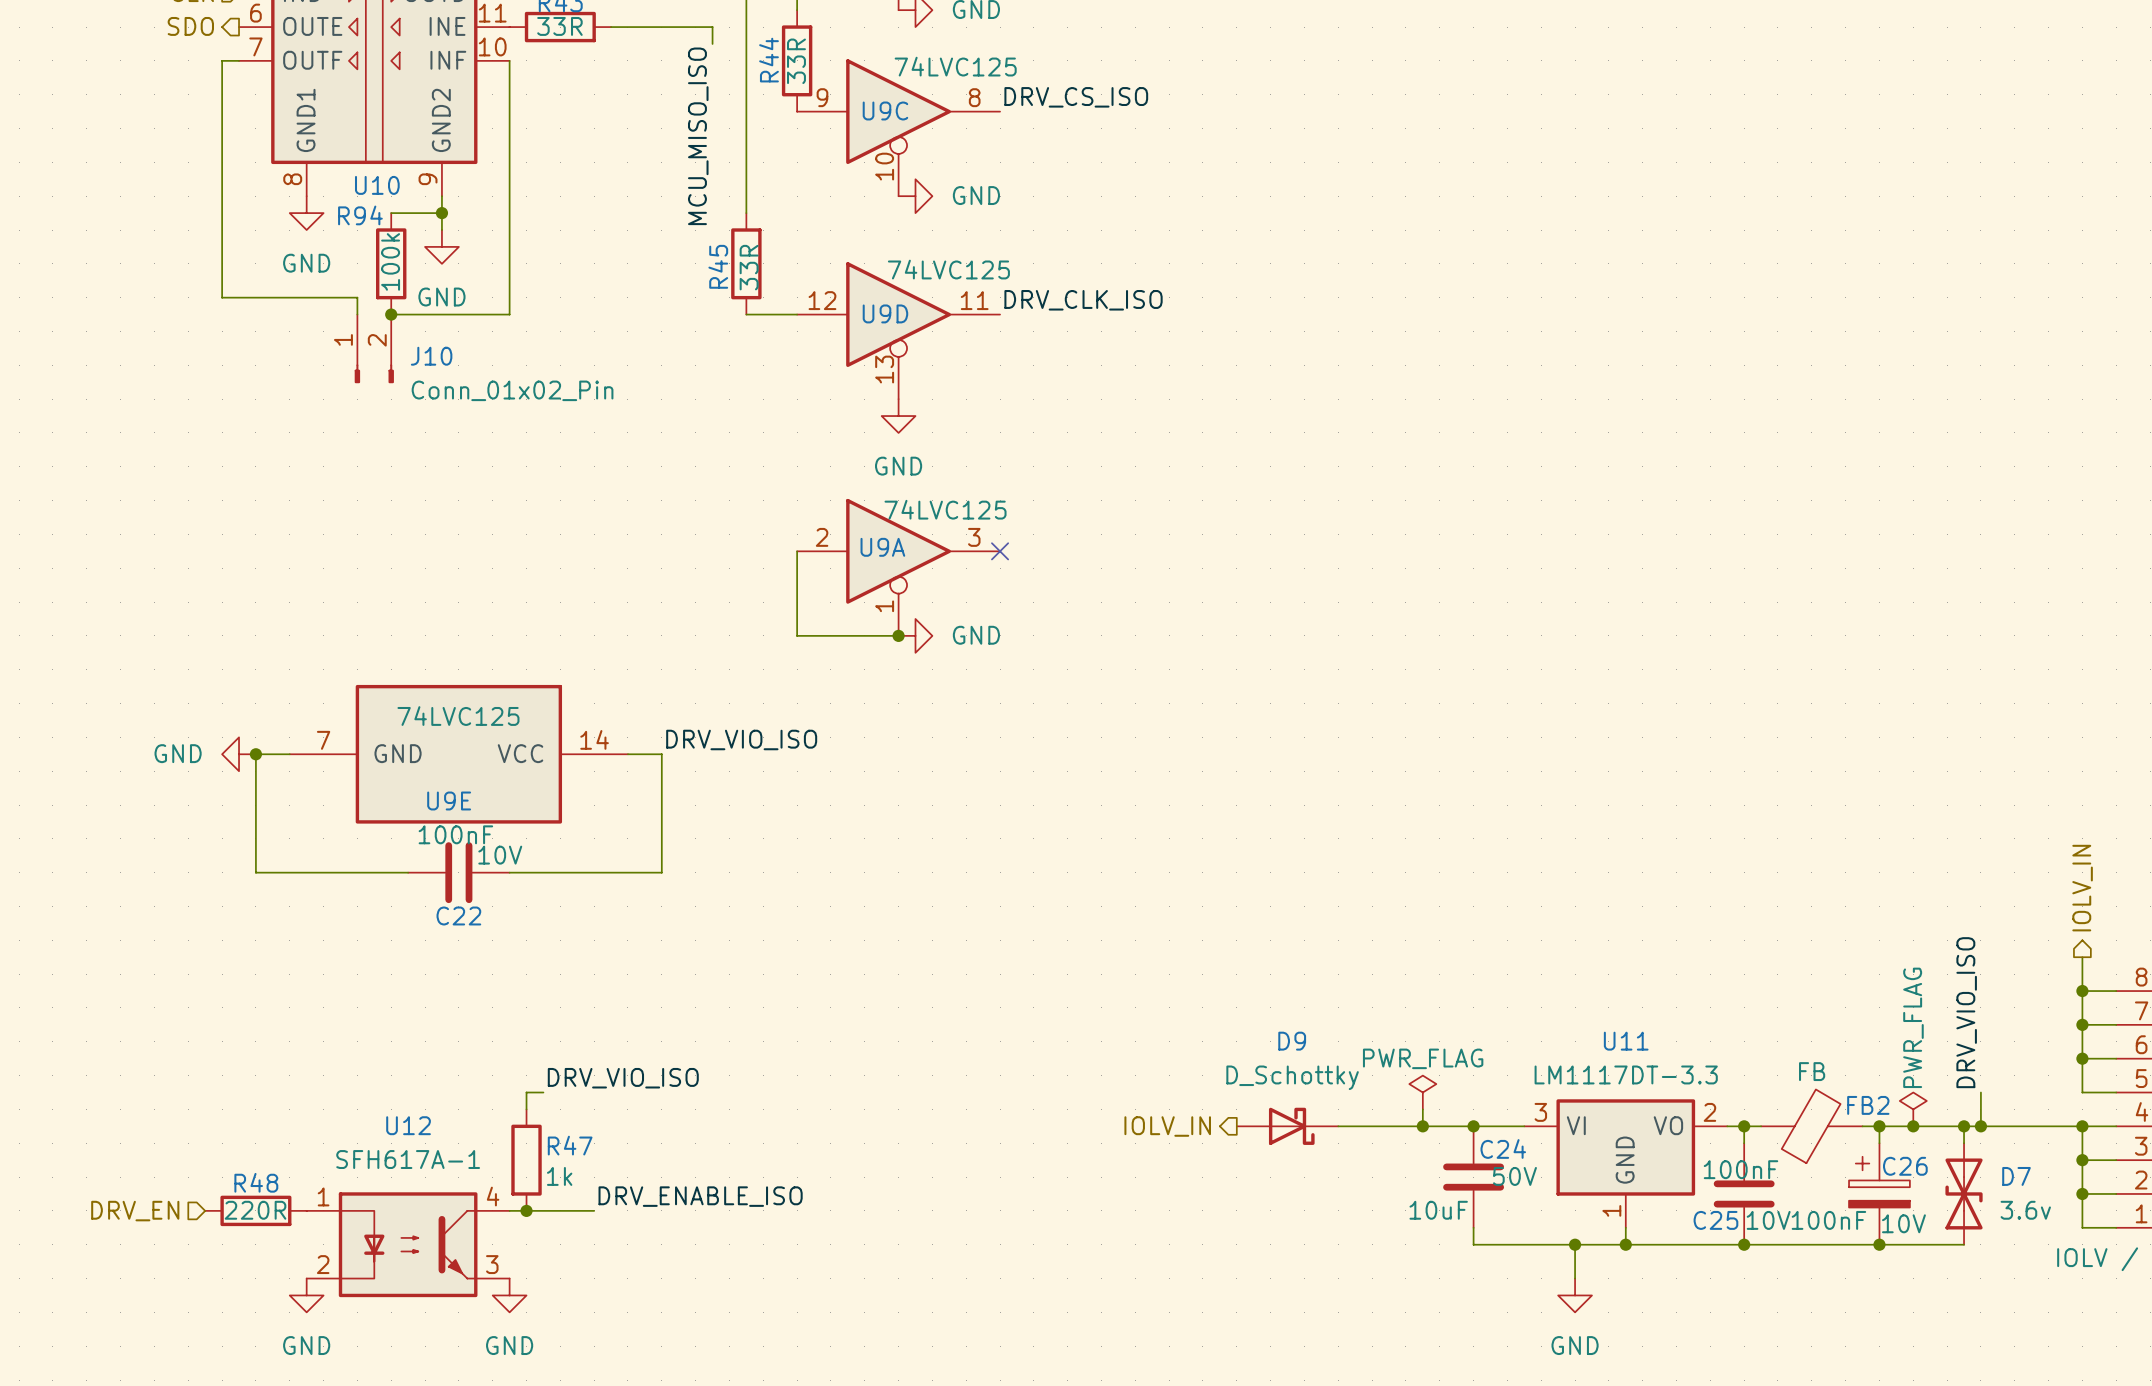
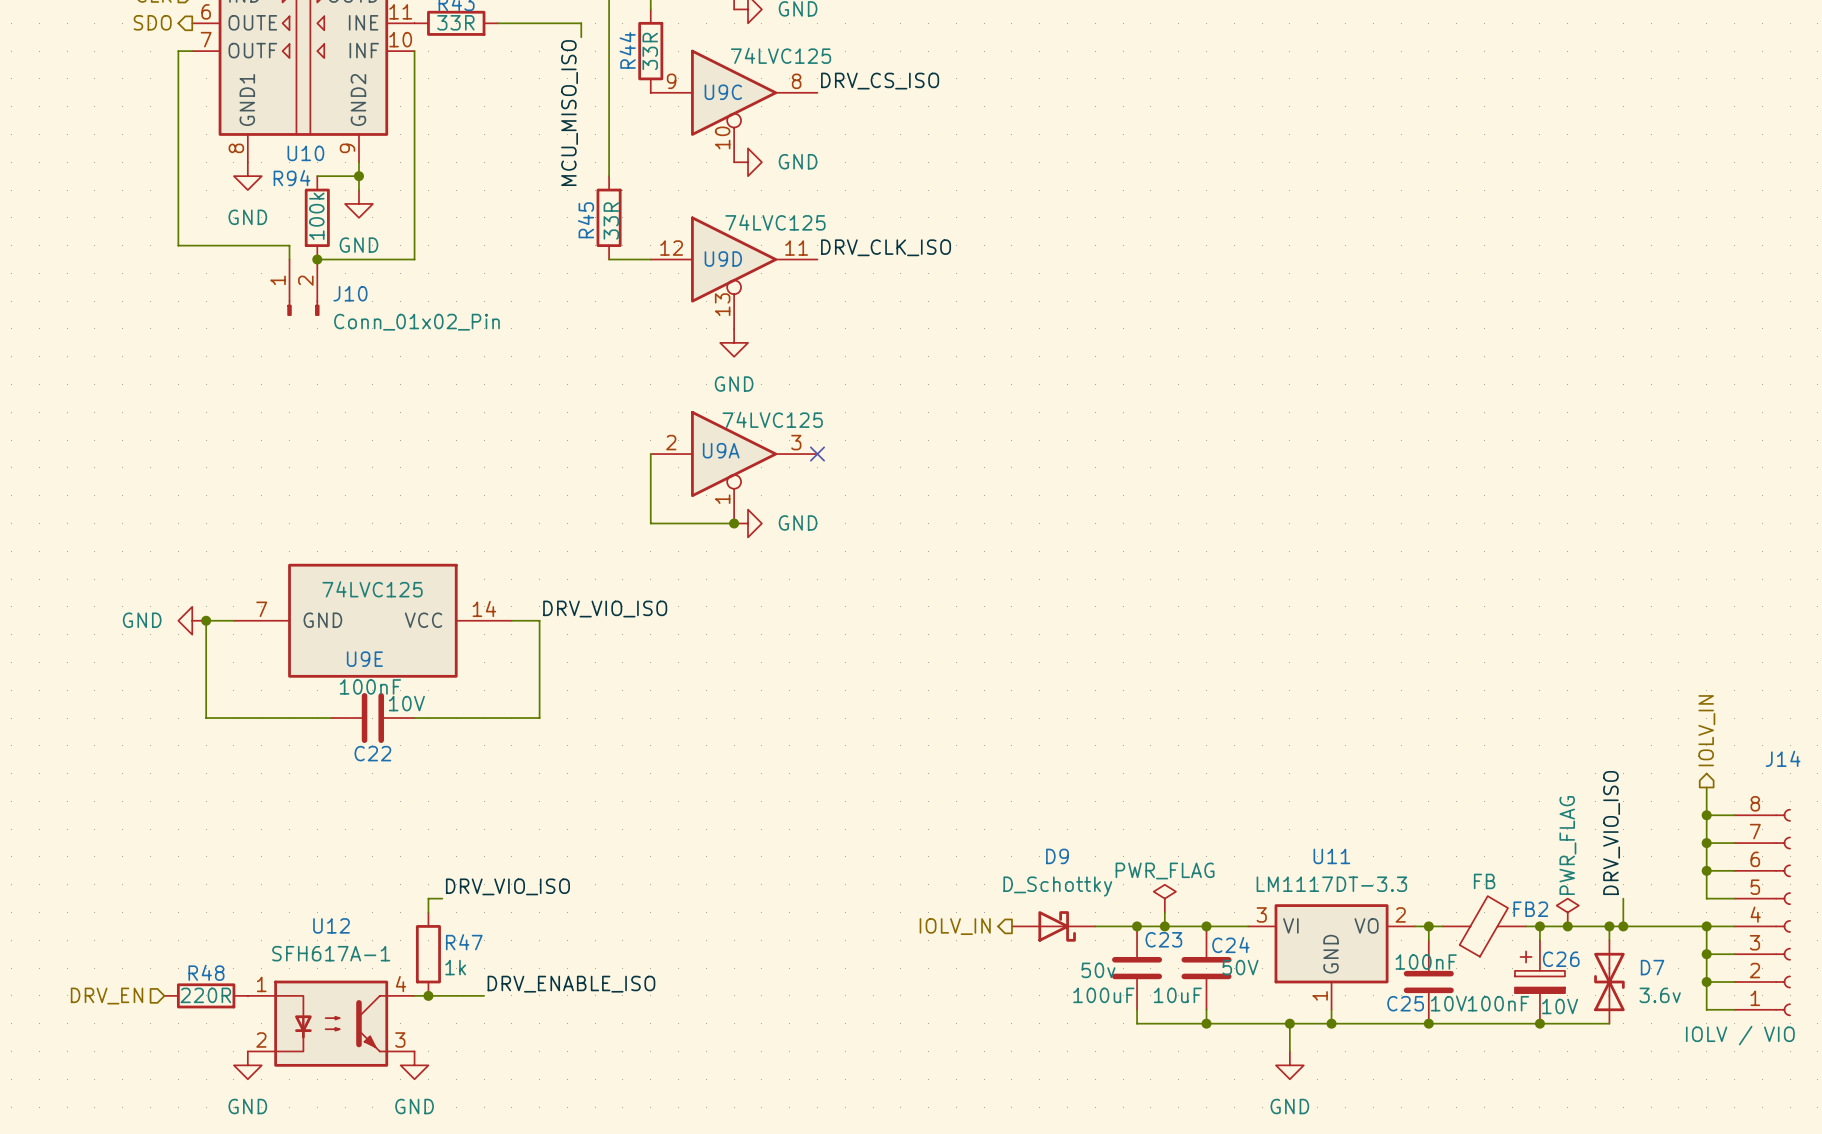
junction: none -> (1137, 926)
C23: none -> 100uF (1137, 968)
wire: none -> (1137, 1009) (1137, 1023) (1206, 1023)
junction: none -> (1206, 1023)

